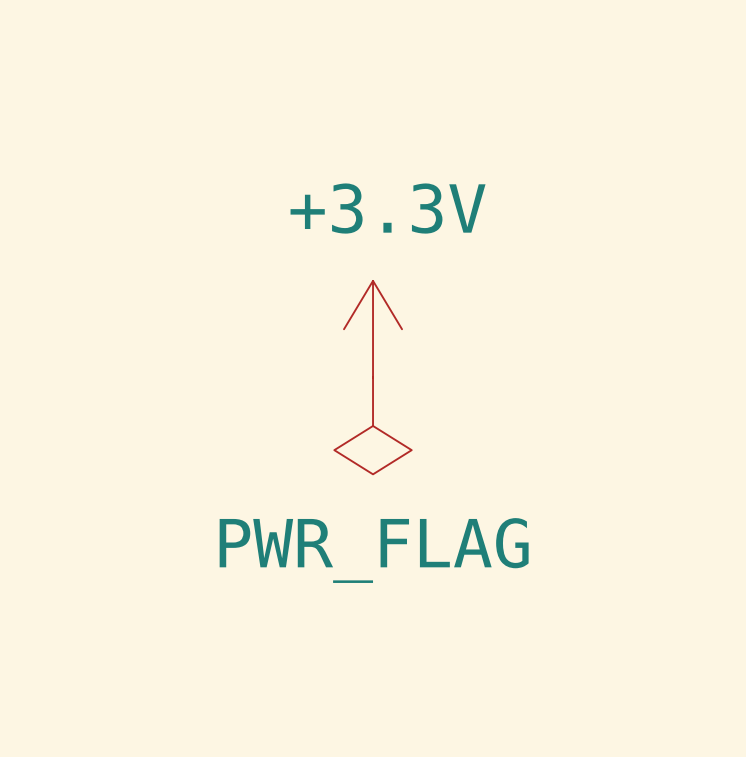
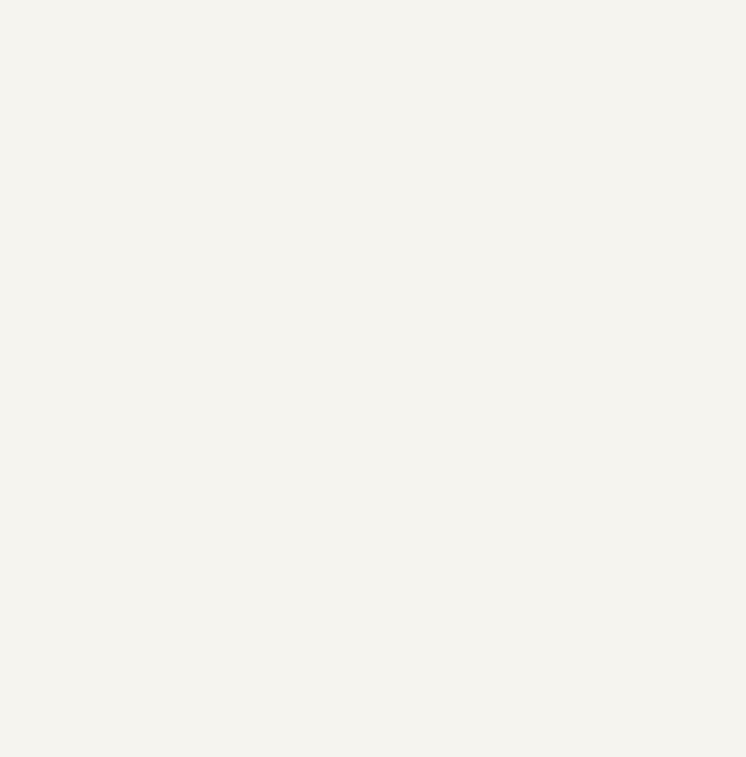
power symbol: +3.3V (373, 329) -> none
power symbol: PWR_FLAG (373, 425) -> none

